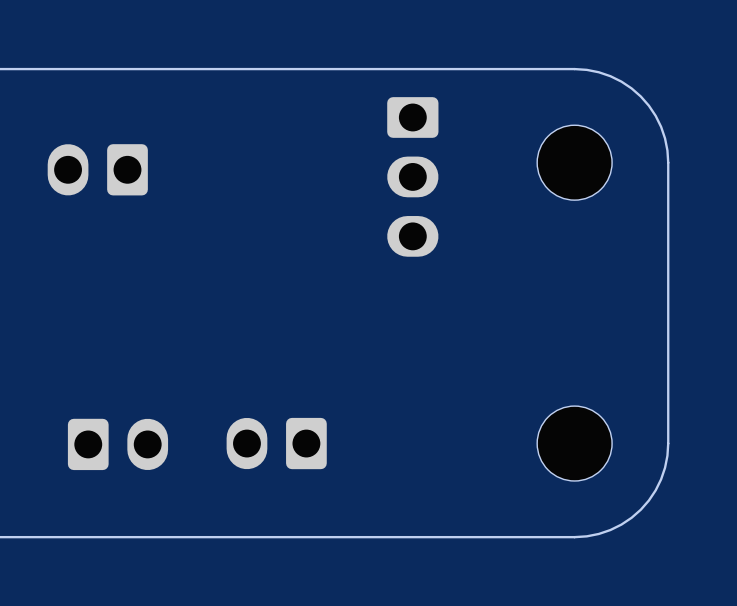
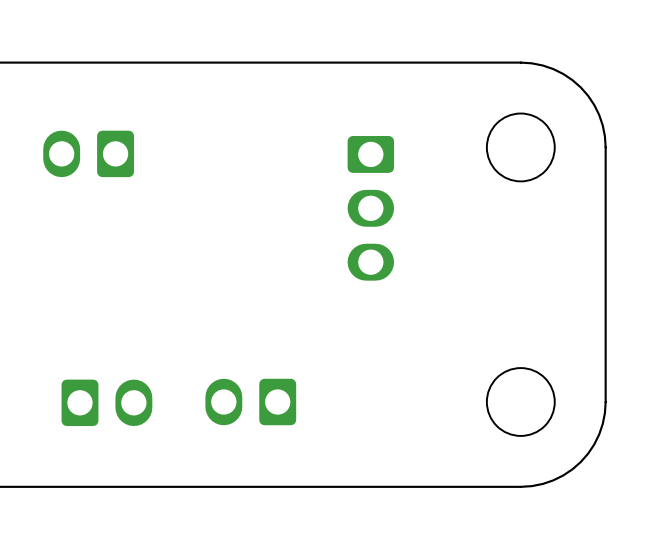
part position: (412, 176) -> (370, 208)

